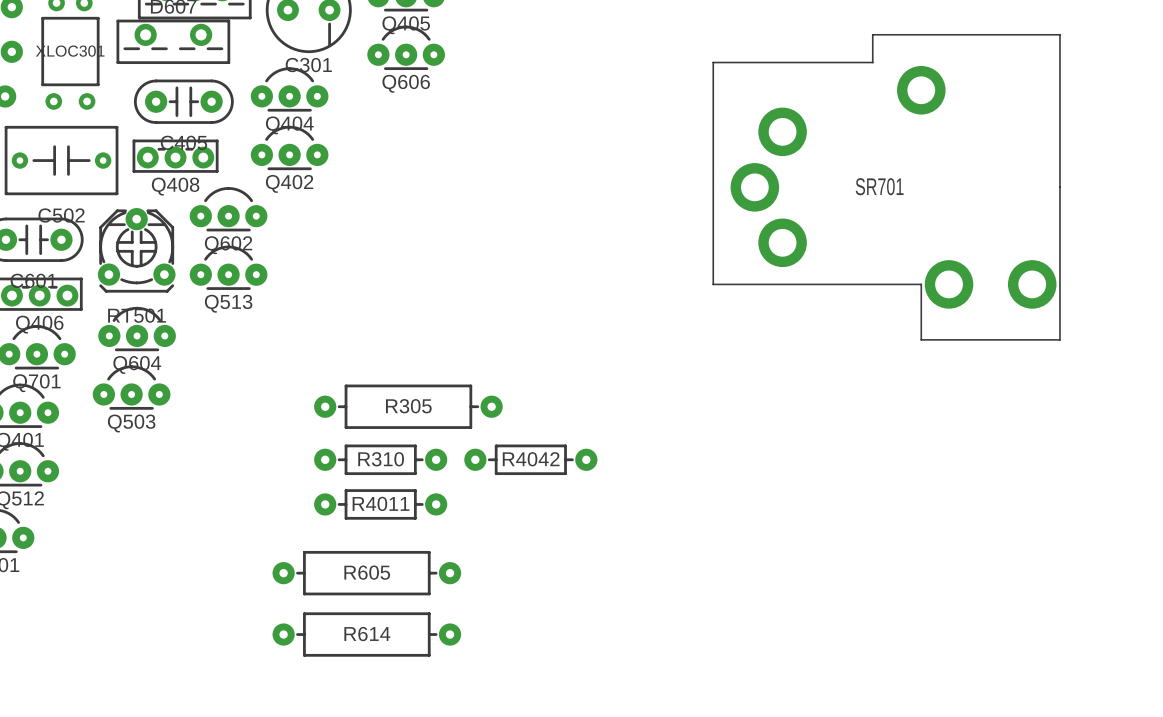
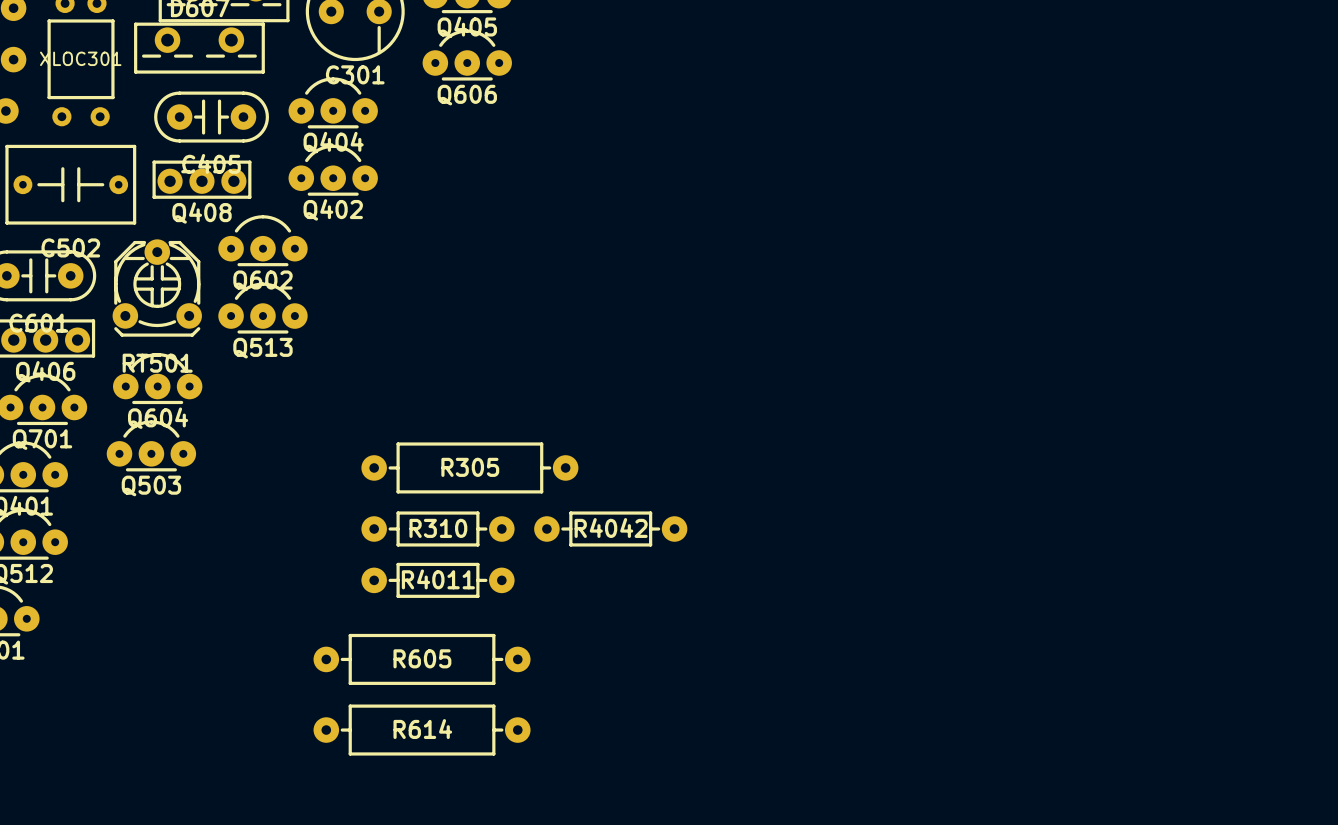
SR701: (886, 187) -> none

